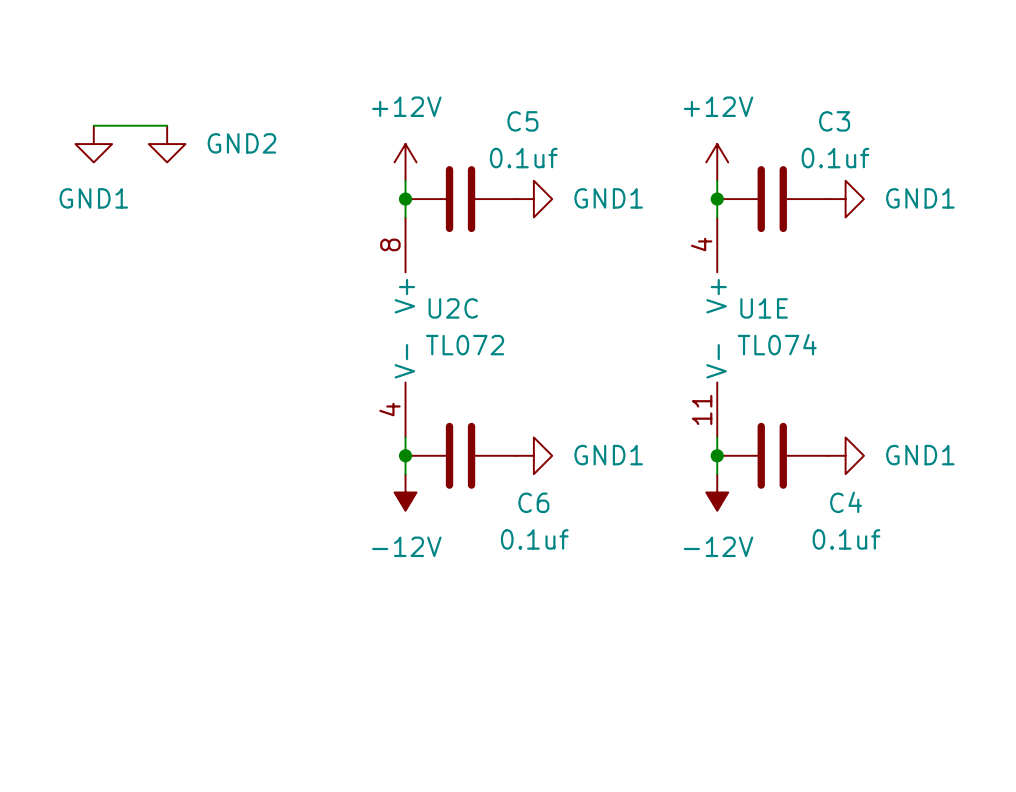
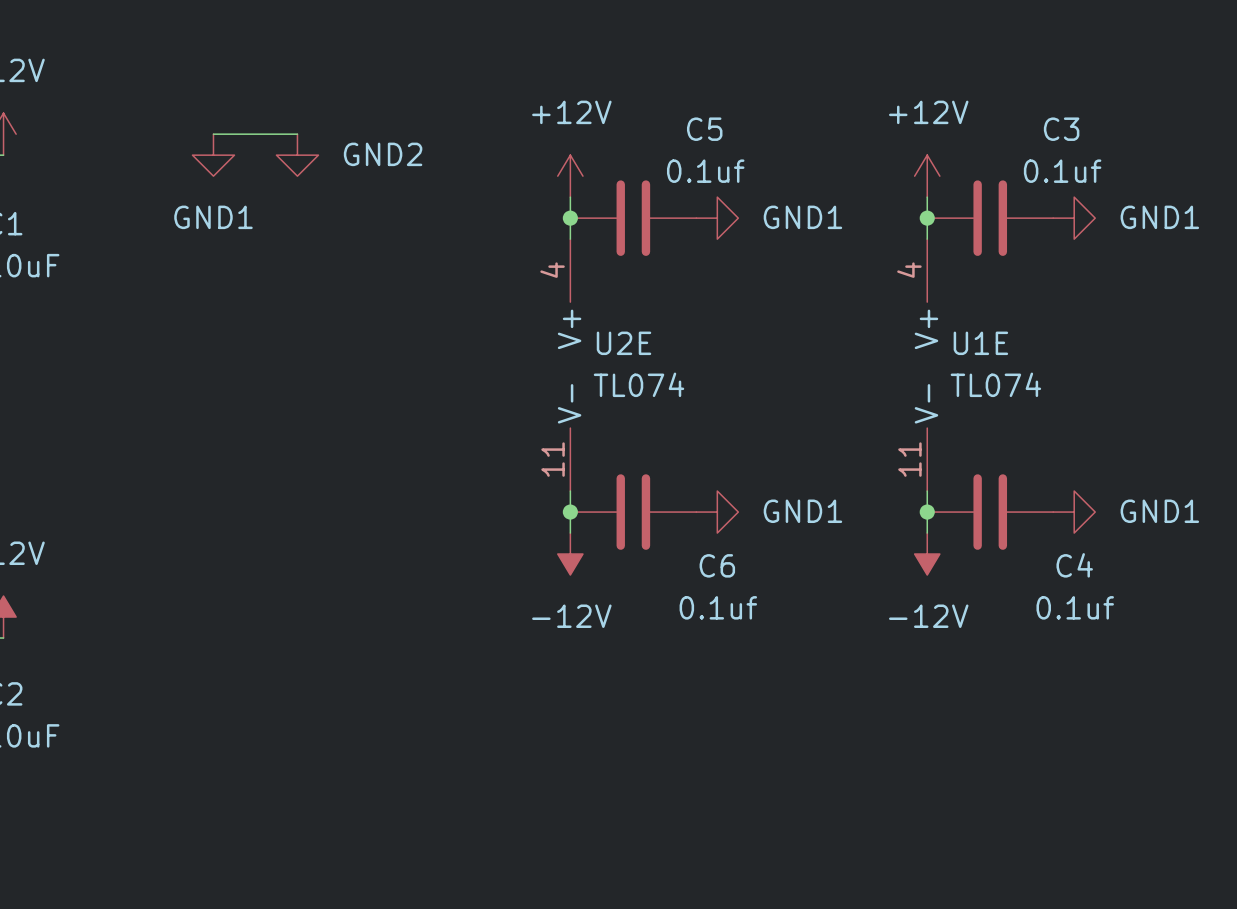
U2C pin number: 8 (390, 244) -> 4 (552, 270)
U2C name: U2C (453, 308) -> U2E (624, 343)
U2C value: TL072 (465, 345) -> TL074 (639, 384)
U2C pin number: 4 (389, 409) -> 11 (553, 459)

